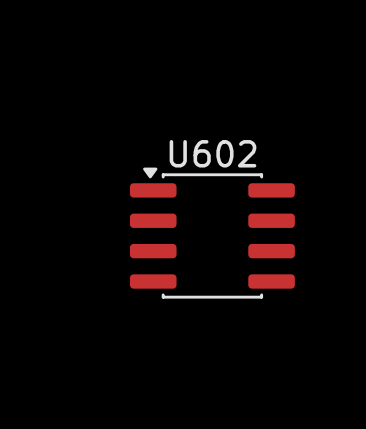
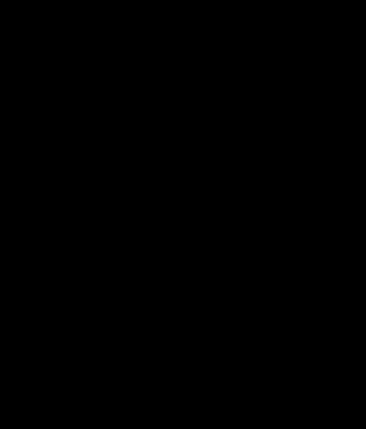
U602: (212, 233) -> none

